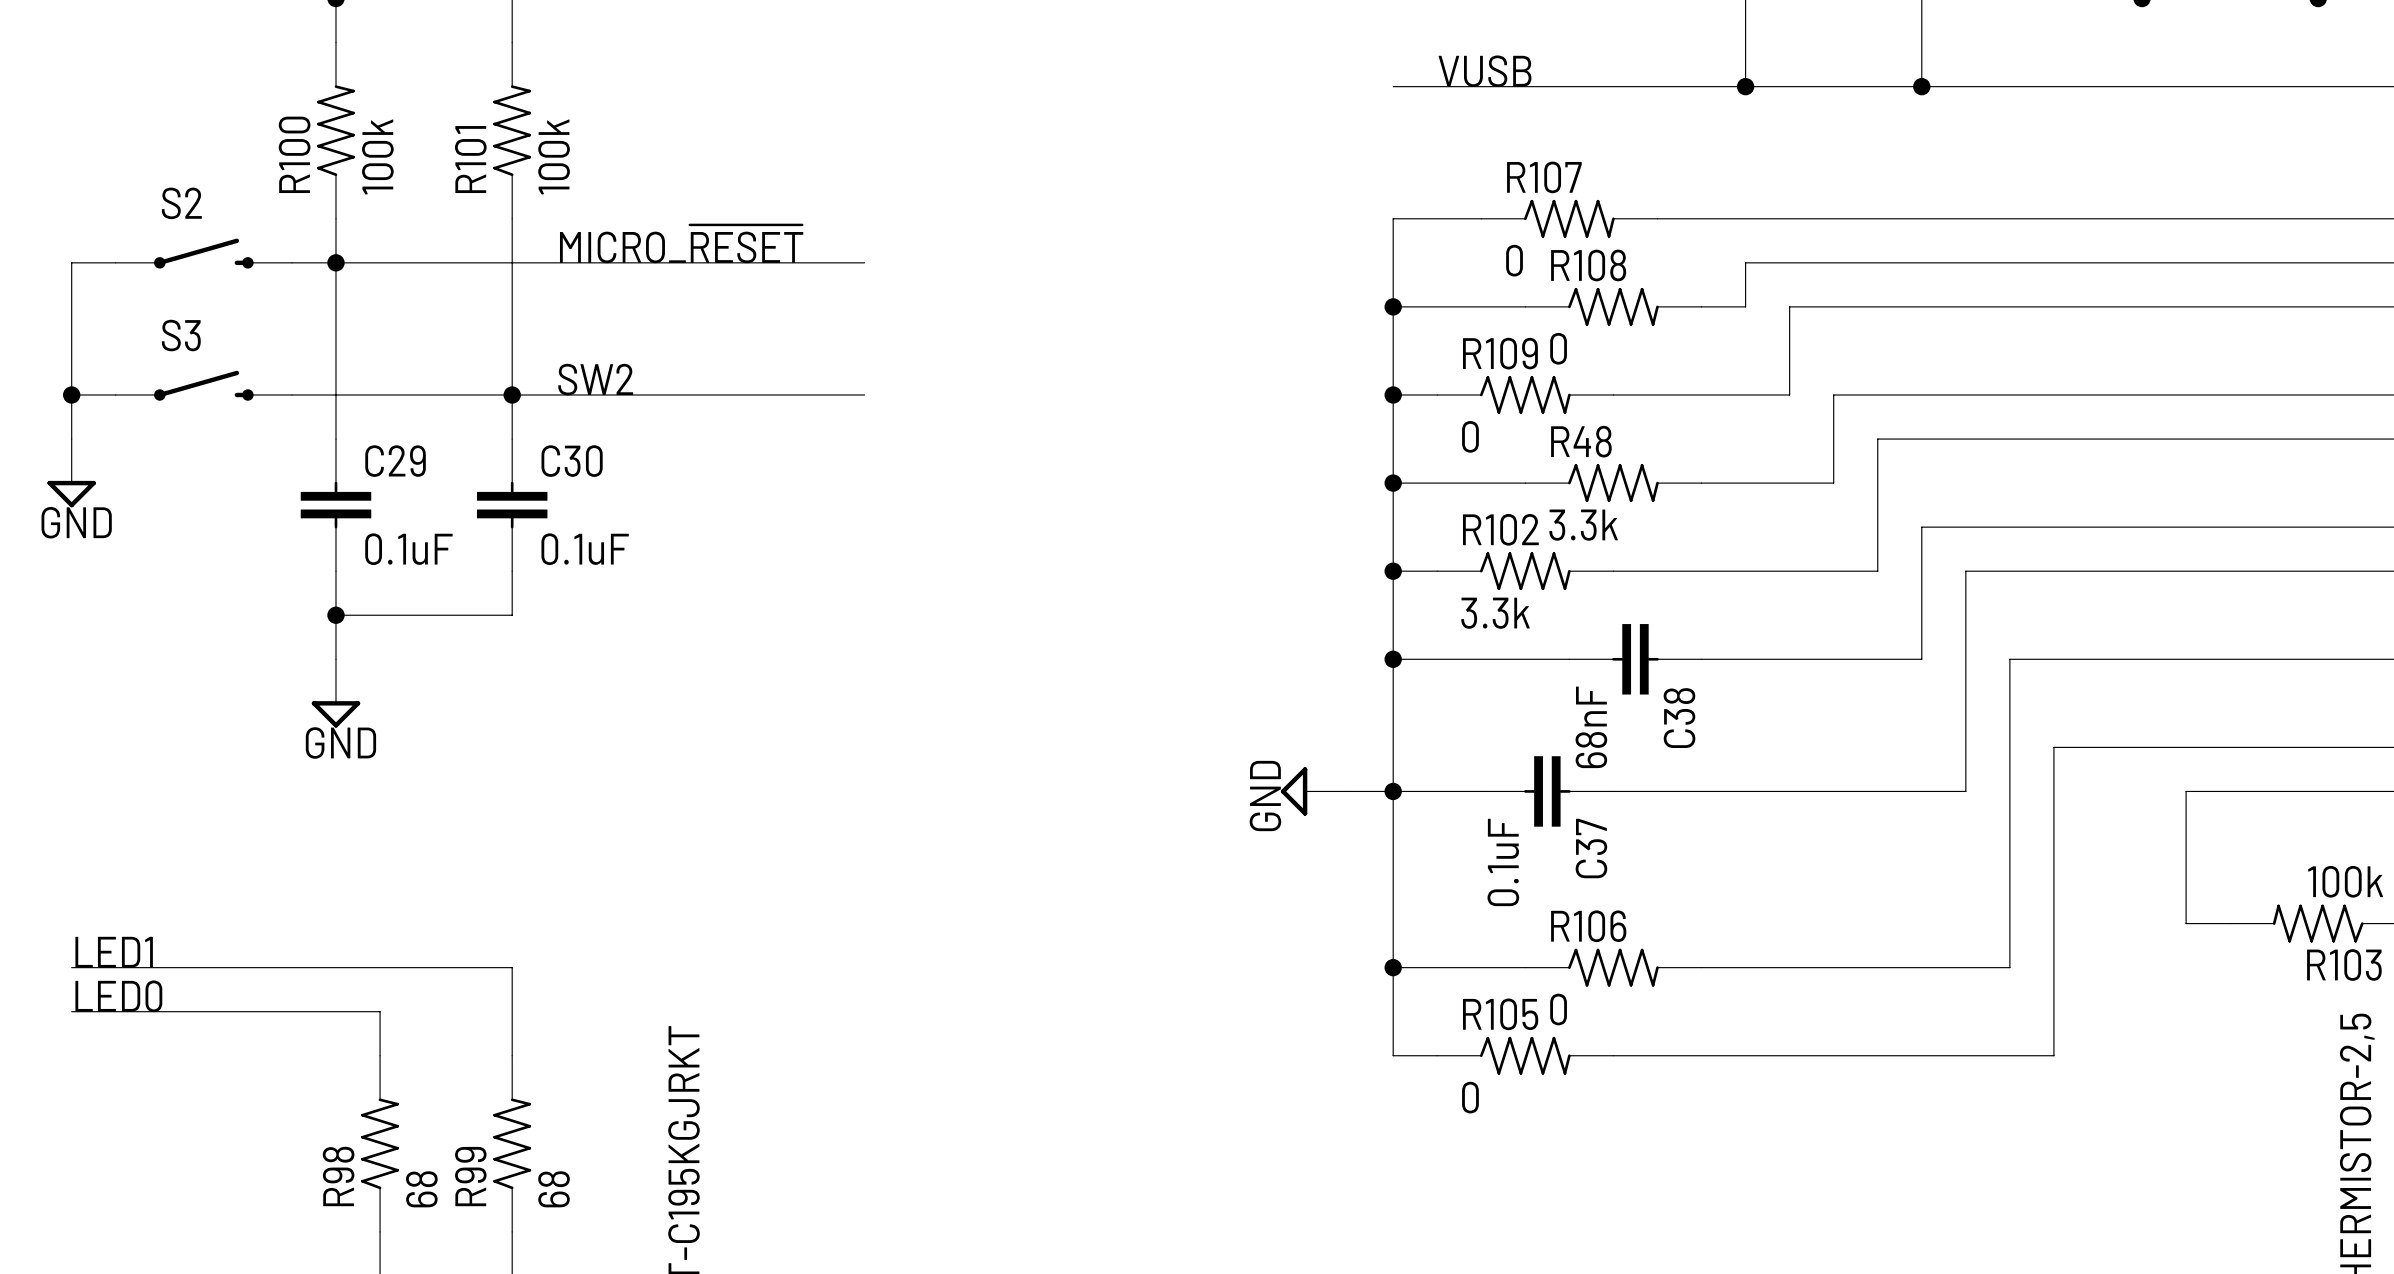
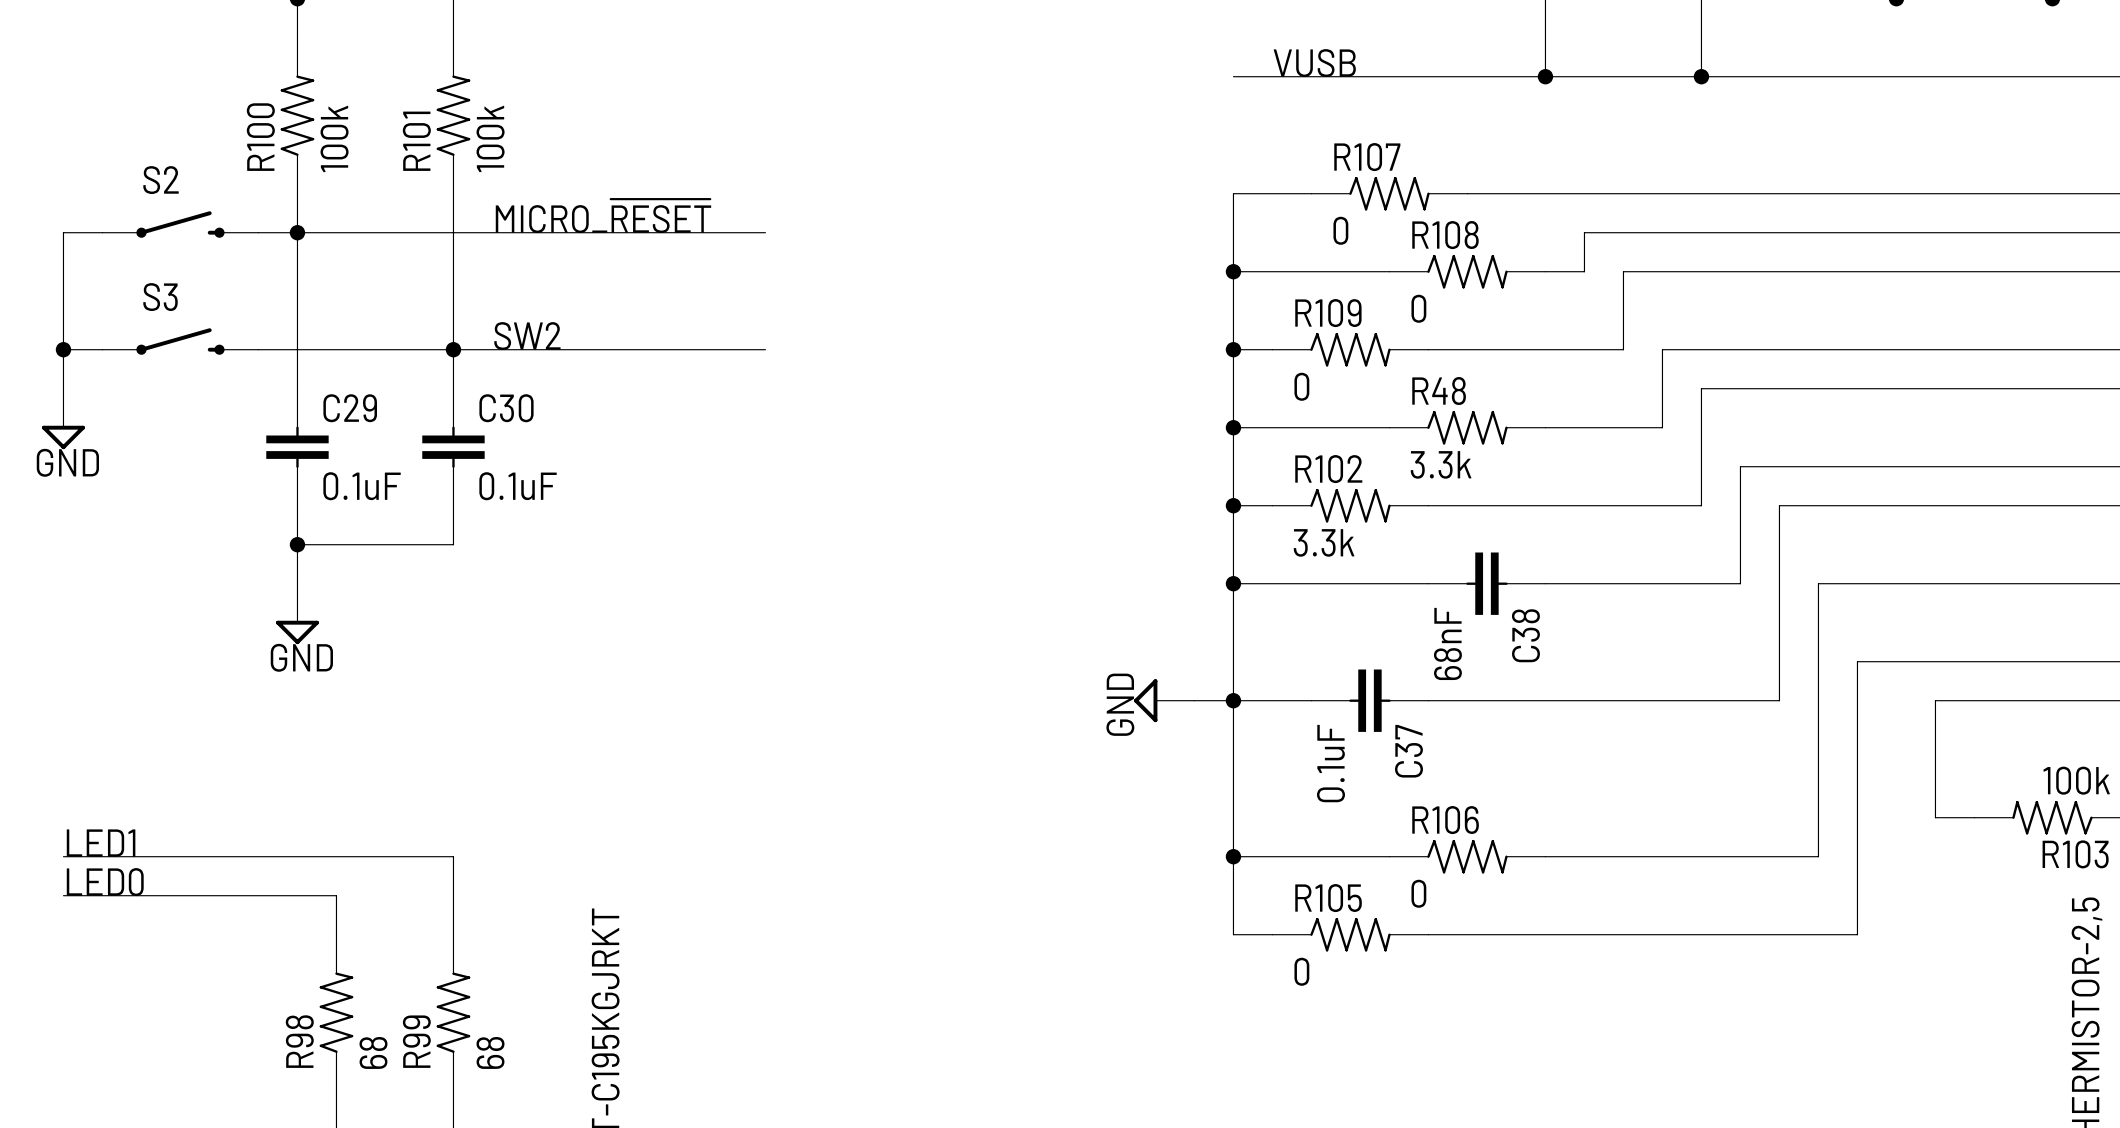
wire: (1789, 262) (1745, 262) (1745, 306) (1701, 306) -> (1584, 232) (1584, 271) (1545, 271)
R108 position: (1613, 306) -> (1467, 271)
wire: (1833, 306) (1789, 306) (1789, 394) -> (1623, 271) (1623, 349) (1584, 349)
wire: (1877, 394) (1833, 394) (1833, 483) -> (1662, 427) (1623, 427)
wire: (1877, 439) (1921, 439) -> (1662, 388) (1662, 349)
R48 position: (1613, 483) -> (1467, 427)
wire: (1877, 483) (1877, 571) -> (1701, 505) (1662, 505)
wire: (1921, 527) (1965, 527) -> (1701, 466) (1701, 388)
wire: (1921, 571) (1921, 659) -> (1740, 583) (1701, 583)
wire: (1965, 571) (2009, 571) -> (1740, 505) (1740, 466)
C38 position: (1635, 659) -> (1486, 583)
wire: (1965, 659) (1965, 791) -> (1779, 700) (1740, 700)
wire: (2009, 659) (2053, 659) -> (1779, 583) (1779, 505)
wire: (2053, 747) (2097, 747) -> (1818, 661) (1818, 583)
wire: none -> (1857, 661) (1857, 934) (1818, 934)
wire: (2009, 791) (2009, 967) -> none
R106 position: (1613, 967) -> (1467, 856)
wire: (2053, 967) (2053, 1055) -> (1818, 856) (1779, 856)

